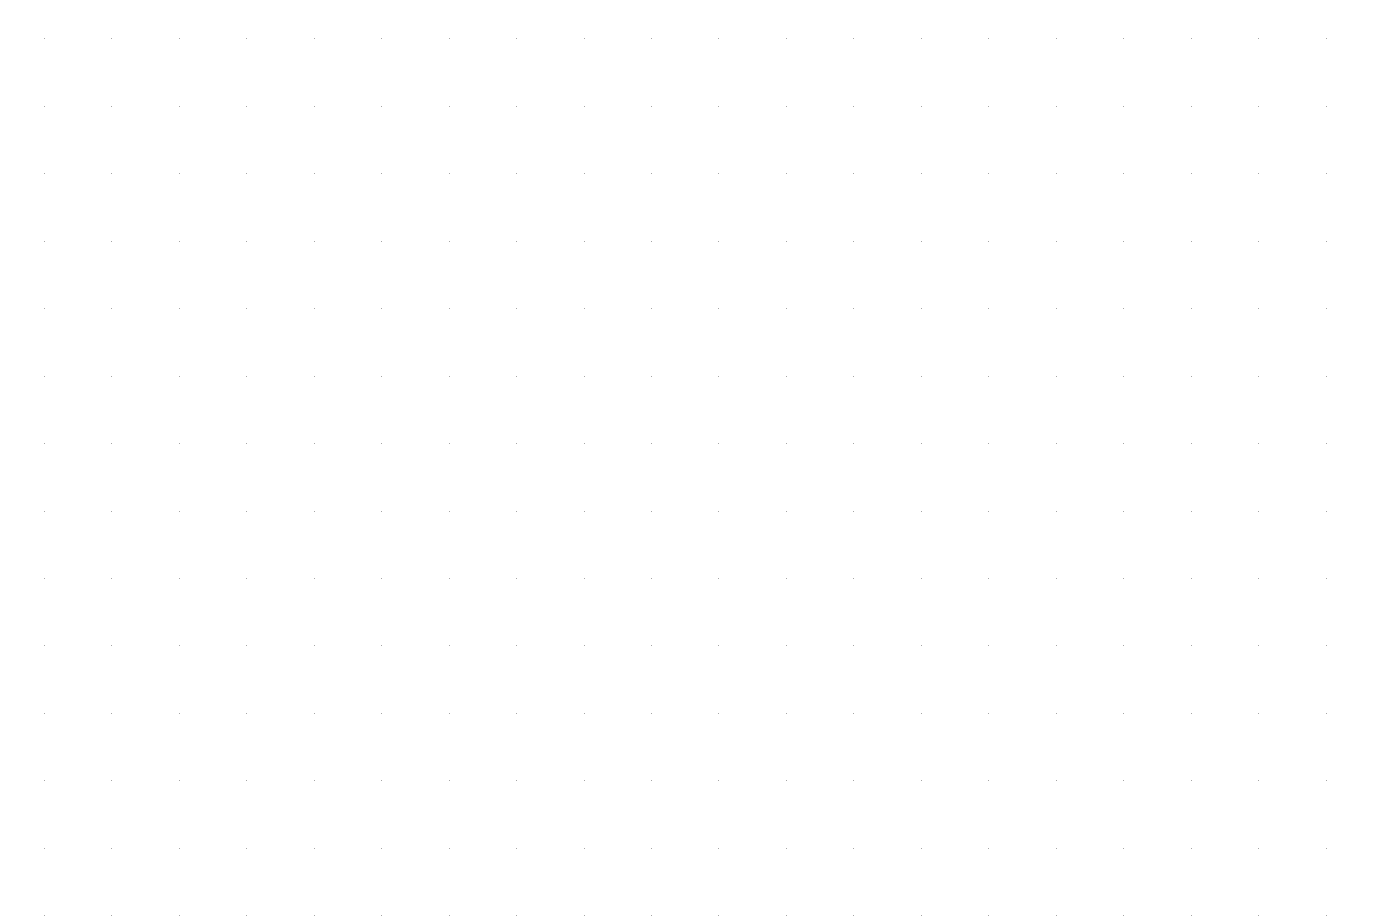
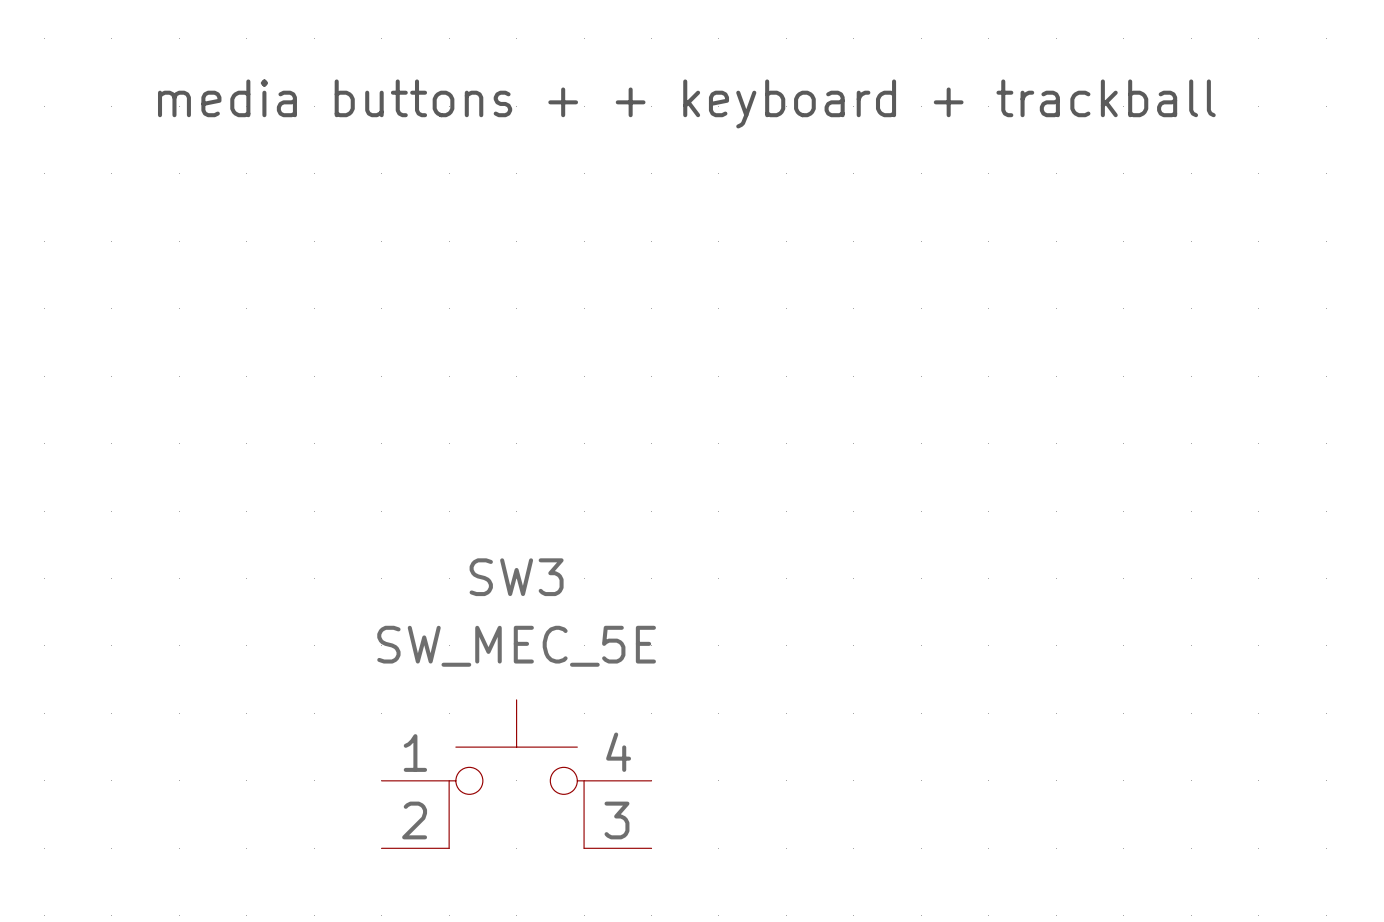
text: none -> media buttons + + keyboard + trackball (686, 103)
SW3: none -> SW_MEC_5E (516, 774)

